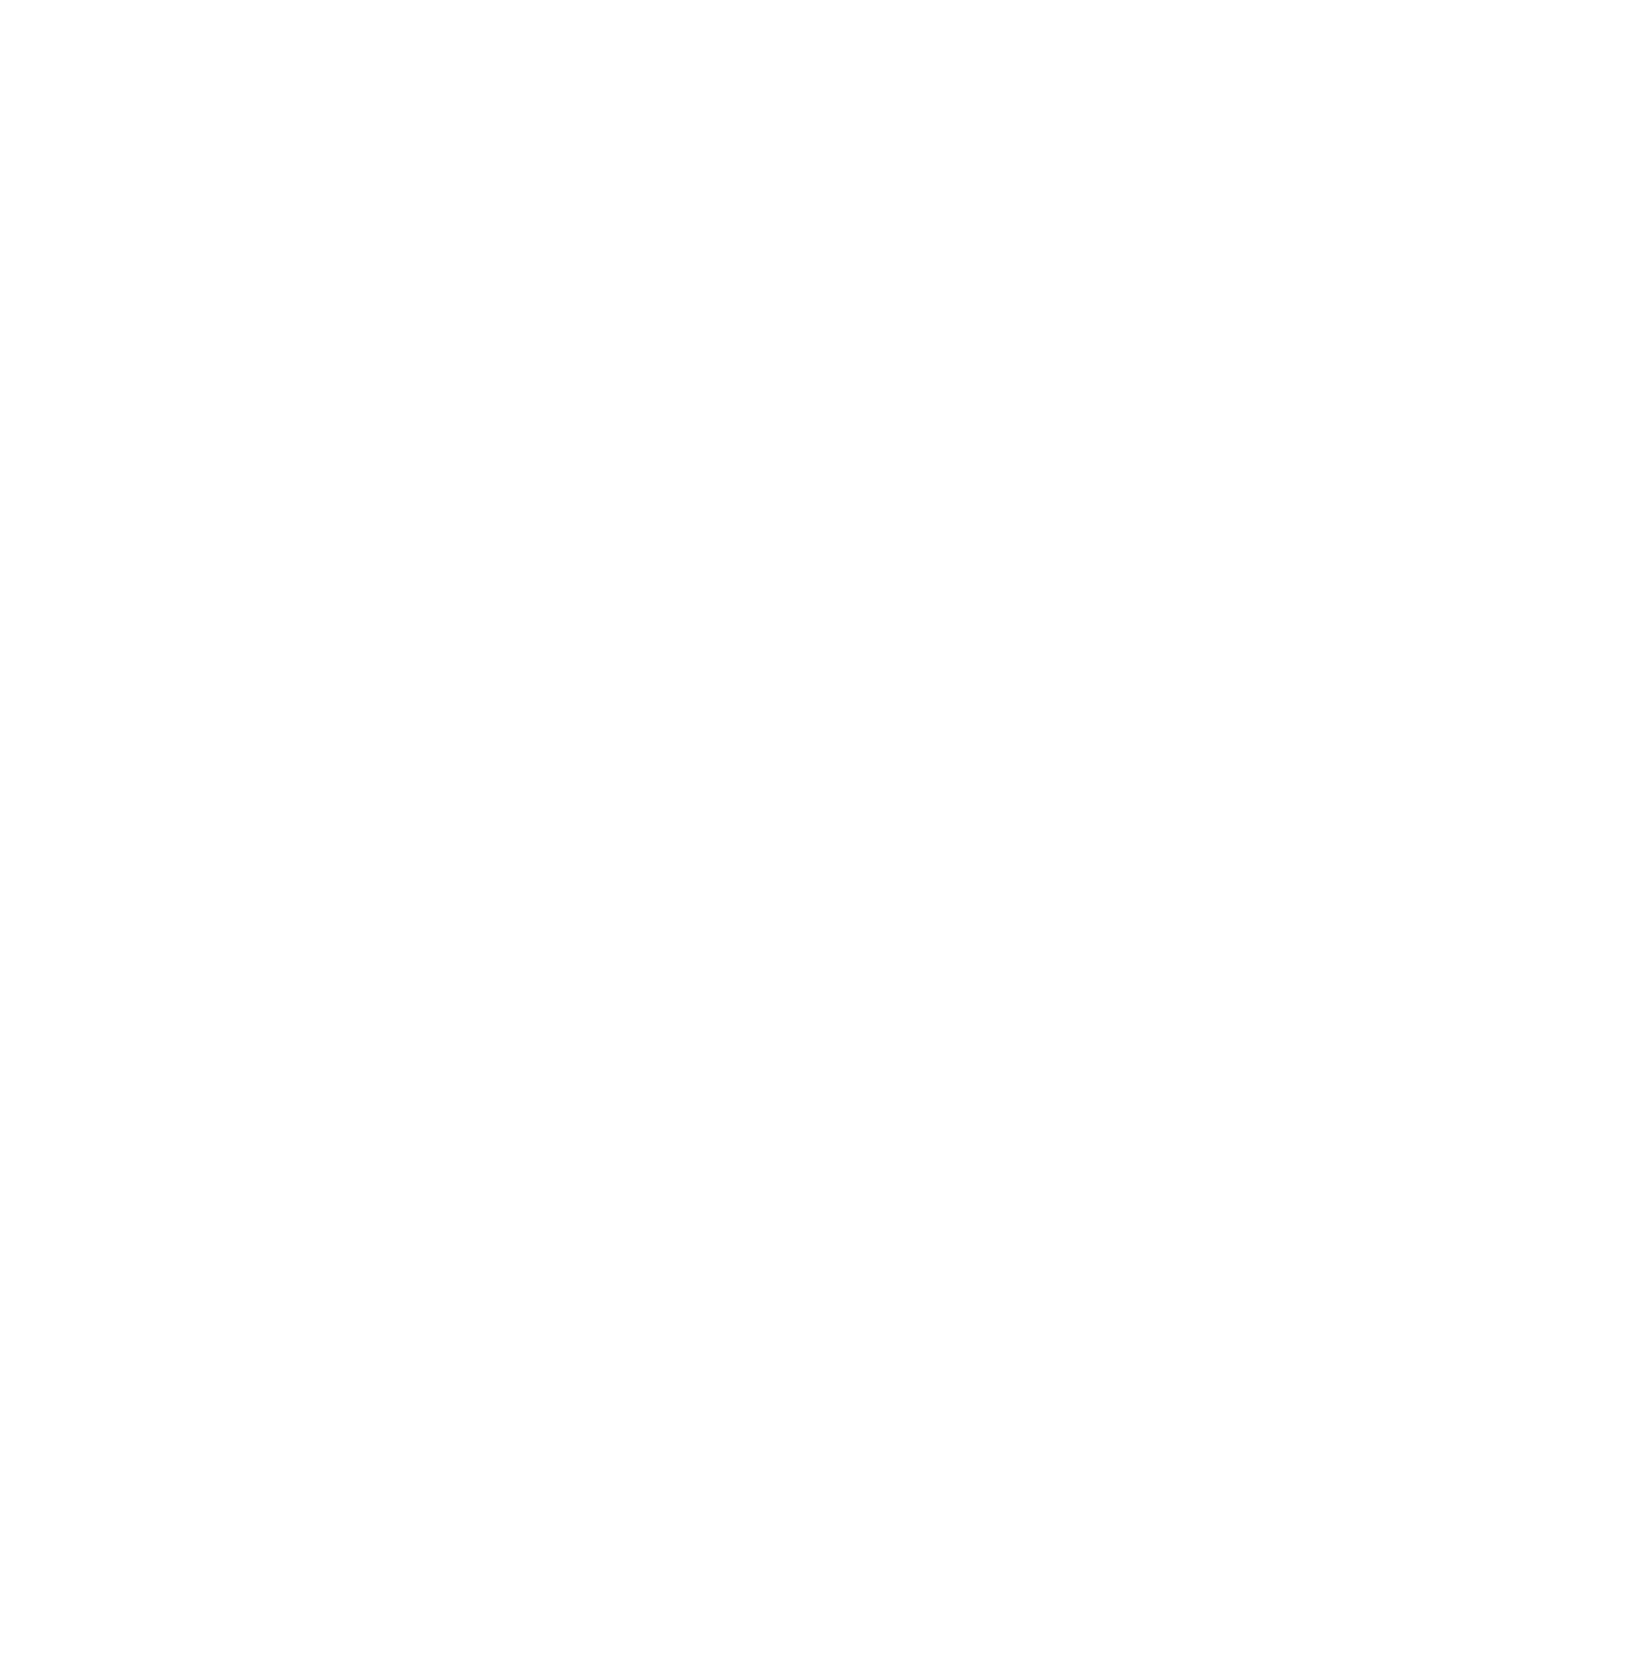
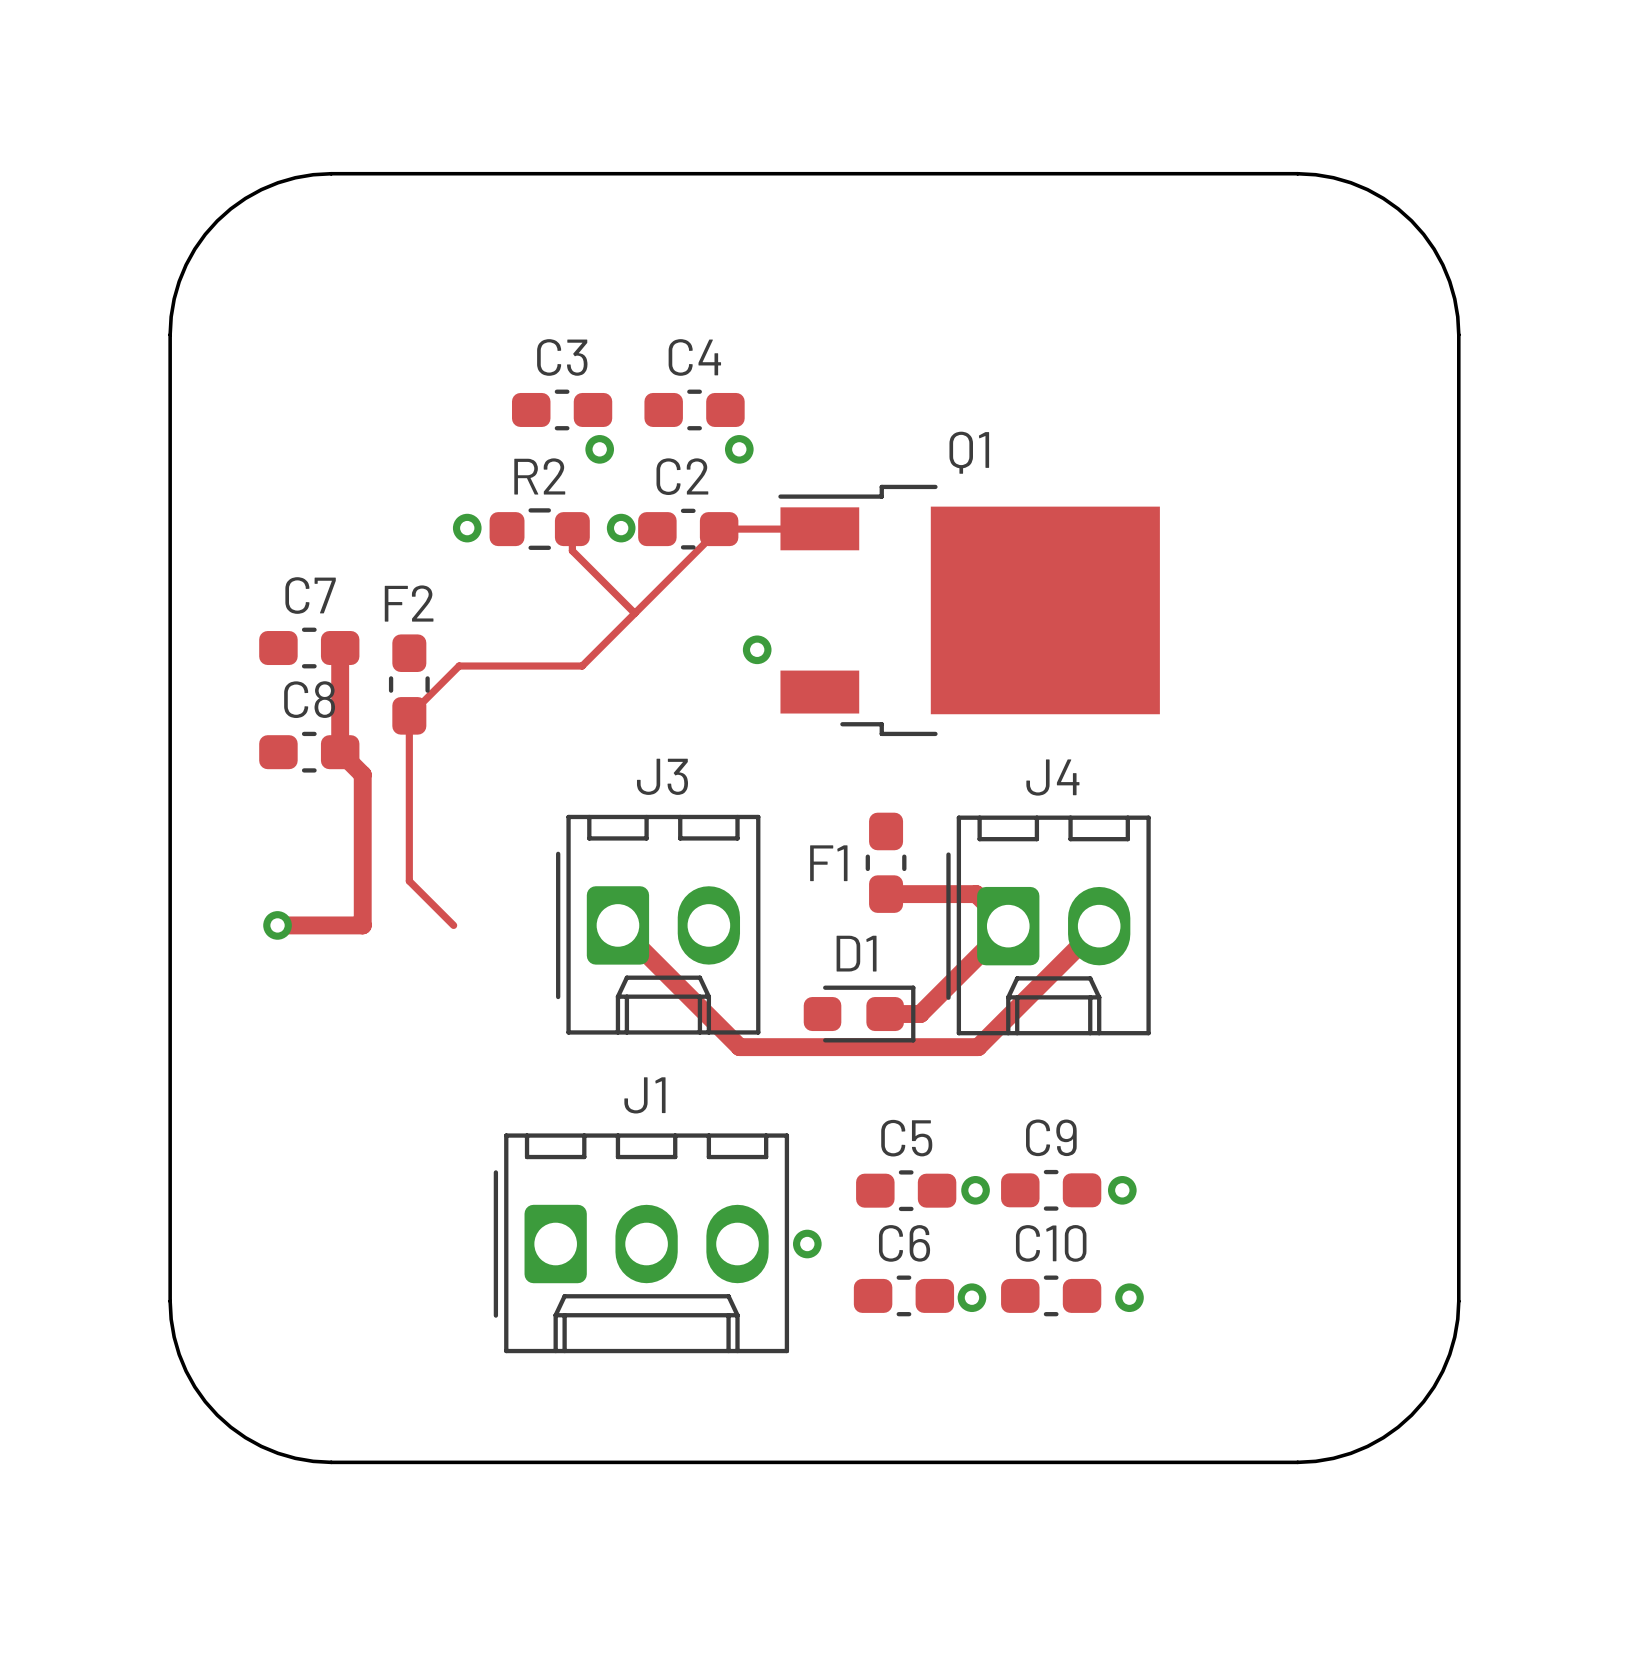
board edge: none -> (331, 173) (1297, 173) (1333, 177) (1367, 189) (1398, 208) (1423, 234) (1442, 264) (1449, 281) (1454, 298) (1458, 334) (1458, 1301) (1454, 1337) (1442, 1371) (1423, 1401) (1398, 1427) (1383, 1437) (1350, 1453) (1333, 1458) (1297, 1462) (331, 1462) (295, 1458) (261, 1446) (230, 1427) (205, 1401) (194, 1386) (179, 1354) (171, 1319) (170, 1301) (171, 316) (179, 281) (186, 264) (205, 234) (217, 220) (245, 198) (261, 189) (295, 177) (331, 173)
C3: none -> (562, 409)
C4: none -> (694, 409)
via: none -> (599, 449)
via: none -> (739, 449)
via: none -> (467, 528)
via: none -> (621, 528)
R2: none -> (539, 529)
top track: none -> (572, 529) (572, 550) (634, 613)
C2: none -> (688, 529)
top track: none -> (819, 529) (719, 529) (582, 666) (459, 666) (409, 715) (409, 881) (453, 925)
Q1: none -> (969, 610)
C7: none -> (309, 648)
top track: none -> (340, 648) (340, 752) (362, 774) (362, 925) (277, 925)
via: none -> (757, 649)
F2: none -> (409, 684)
C8: none -> (309, 752)
F1: none -> (886, 862)
top track: none -> (886, 894) (976, 894) (1008, 926) (920, 1014) (885, 1014)
J3: none -> (658, 924)
via: none -> (277, 925)
top track: none -> (617, 925) (739, 1047) (978, 1047) (1099, 926)
J4: none -> (1048, 925)
D1: none -> (859, 1014)
C5: none -> (906, 1190)
via: none -> (975, 1190)
C9: none -> (1051, 1190)
via: none -> (1122, 1190)
J1: none -> (641, 1243)
via: none -> (807, 1244)
C6: none -> (903, 1295)
C10: none -> (1051, 1295)
via: none -> (971, 1297)
via: none -> (1129, 1297)

